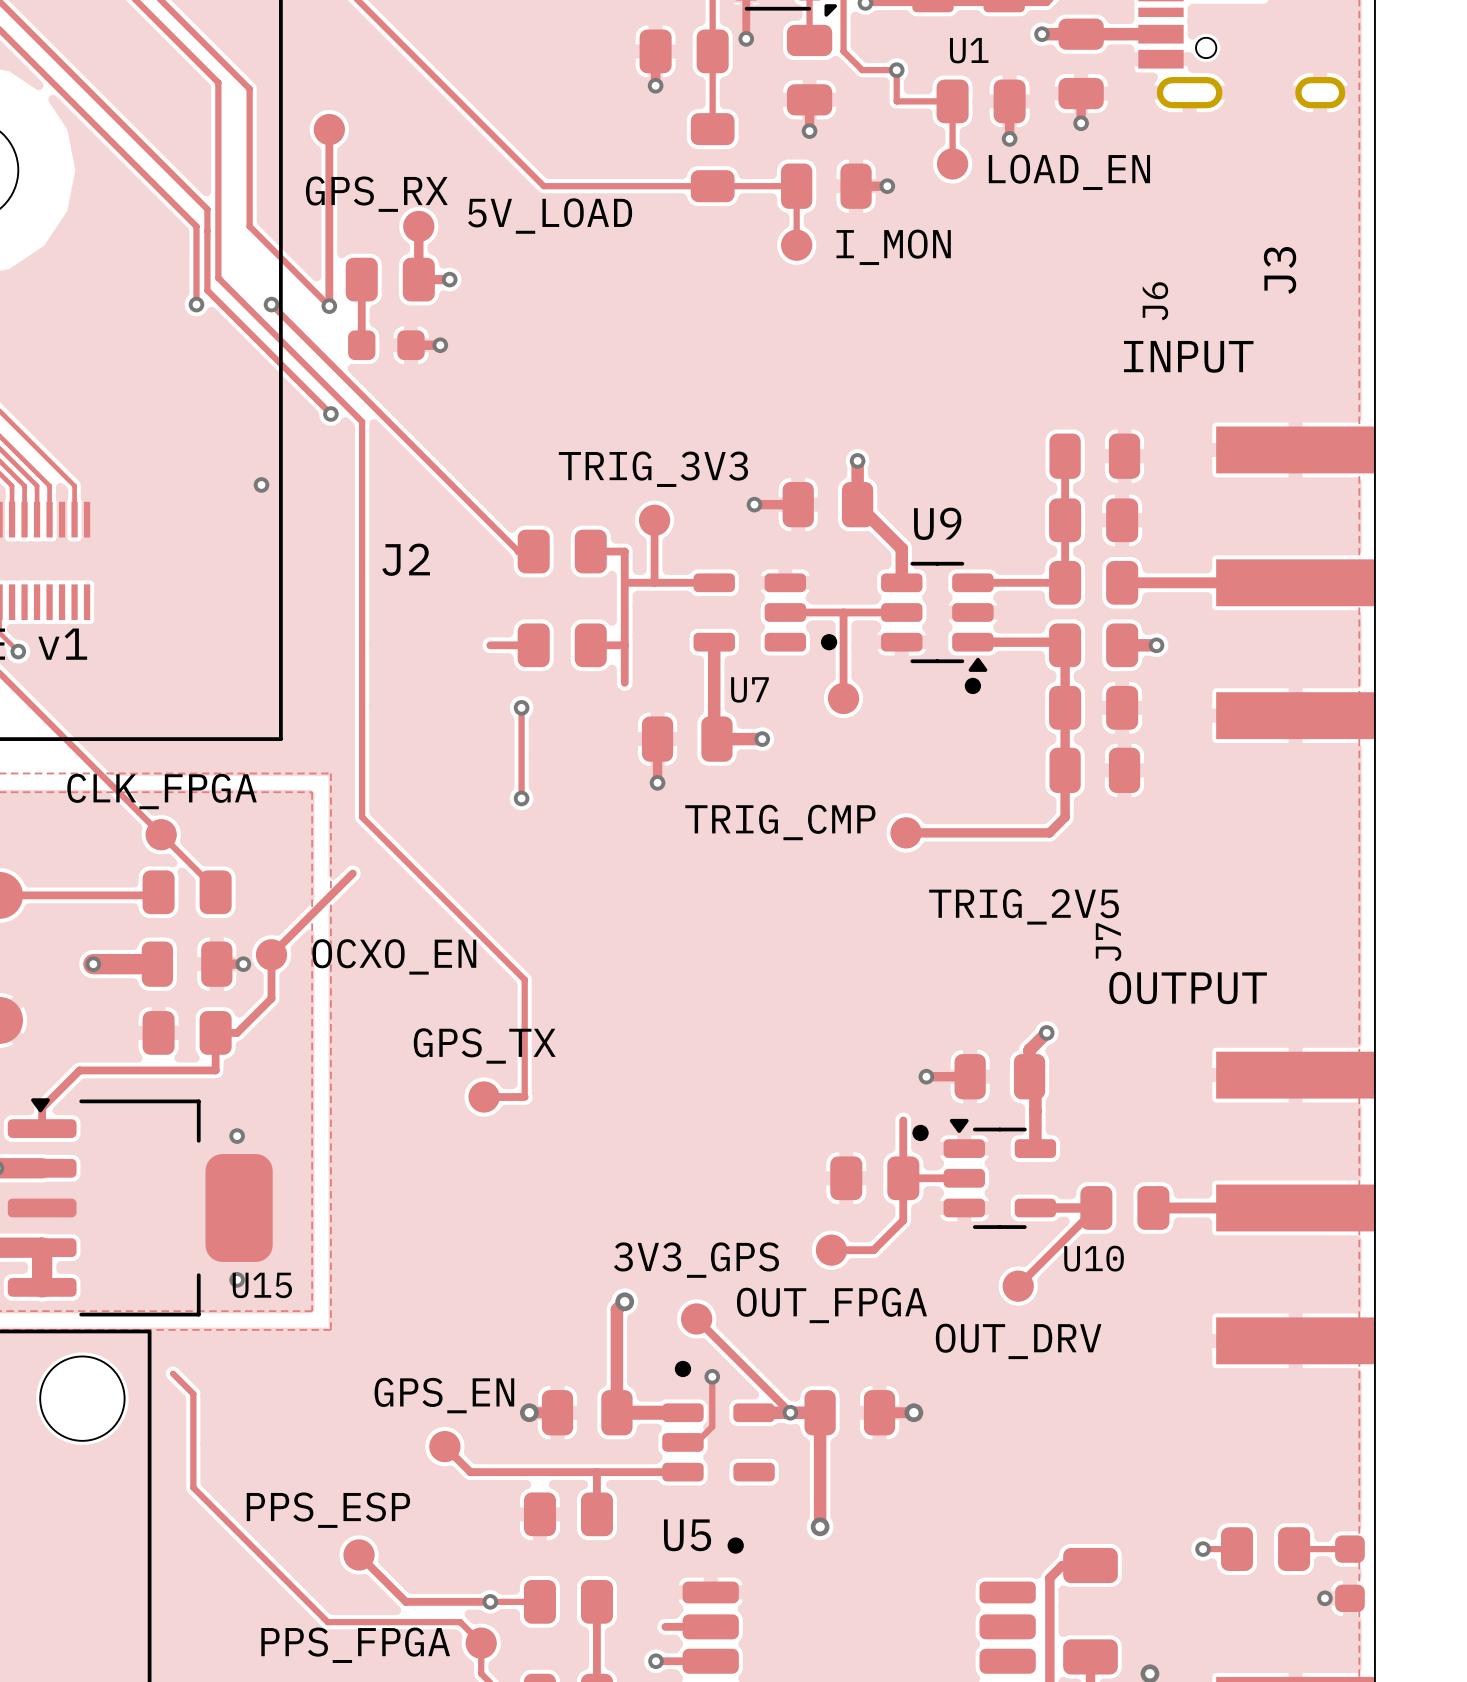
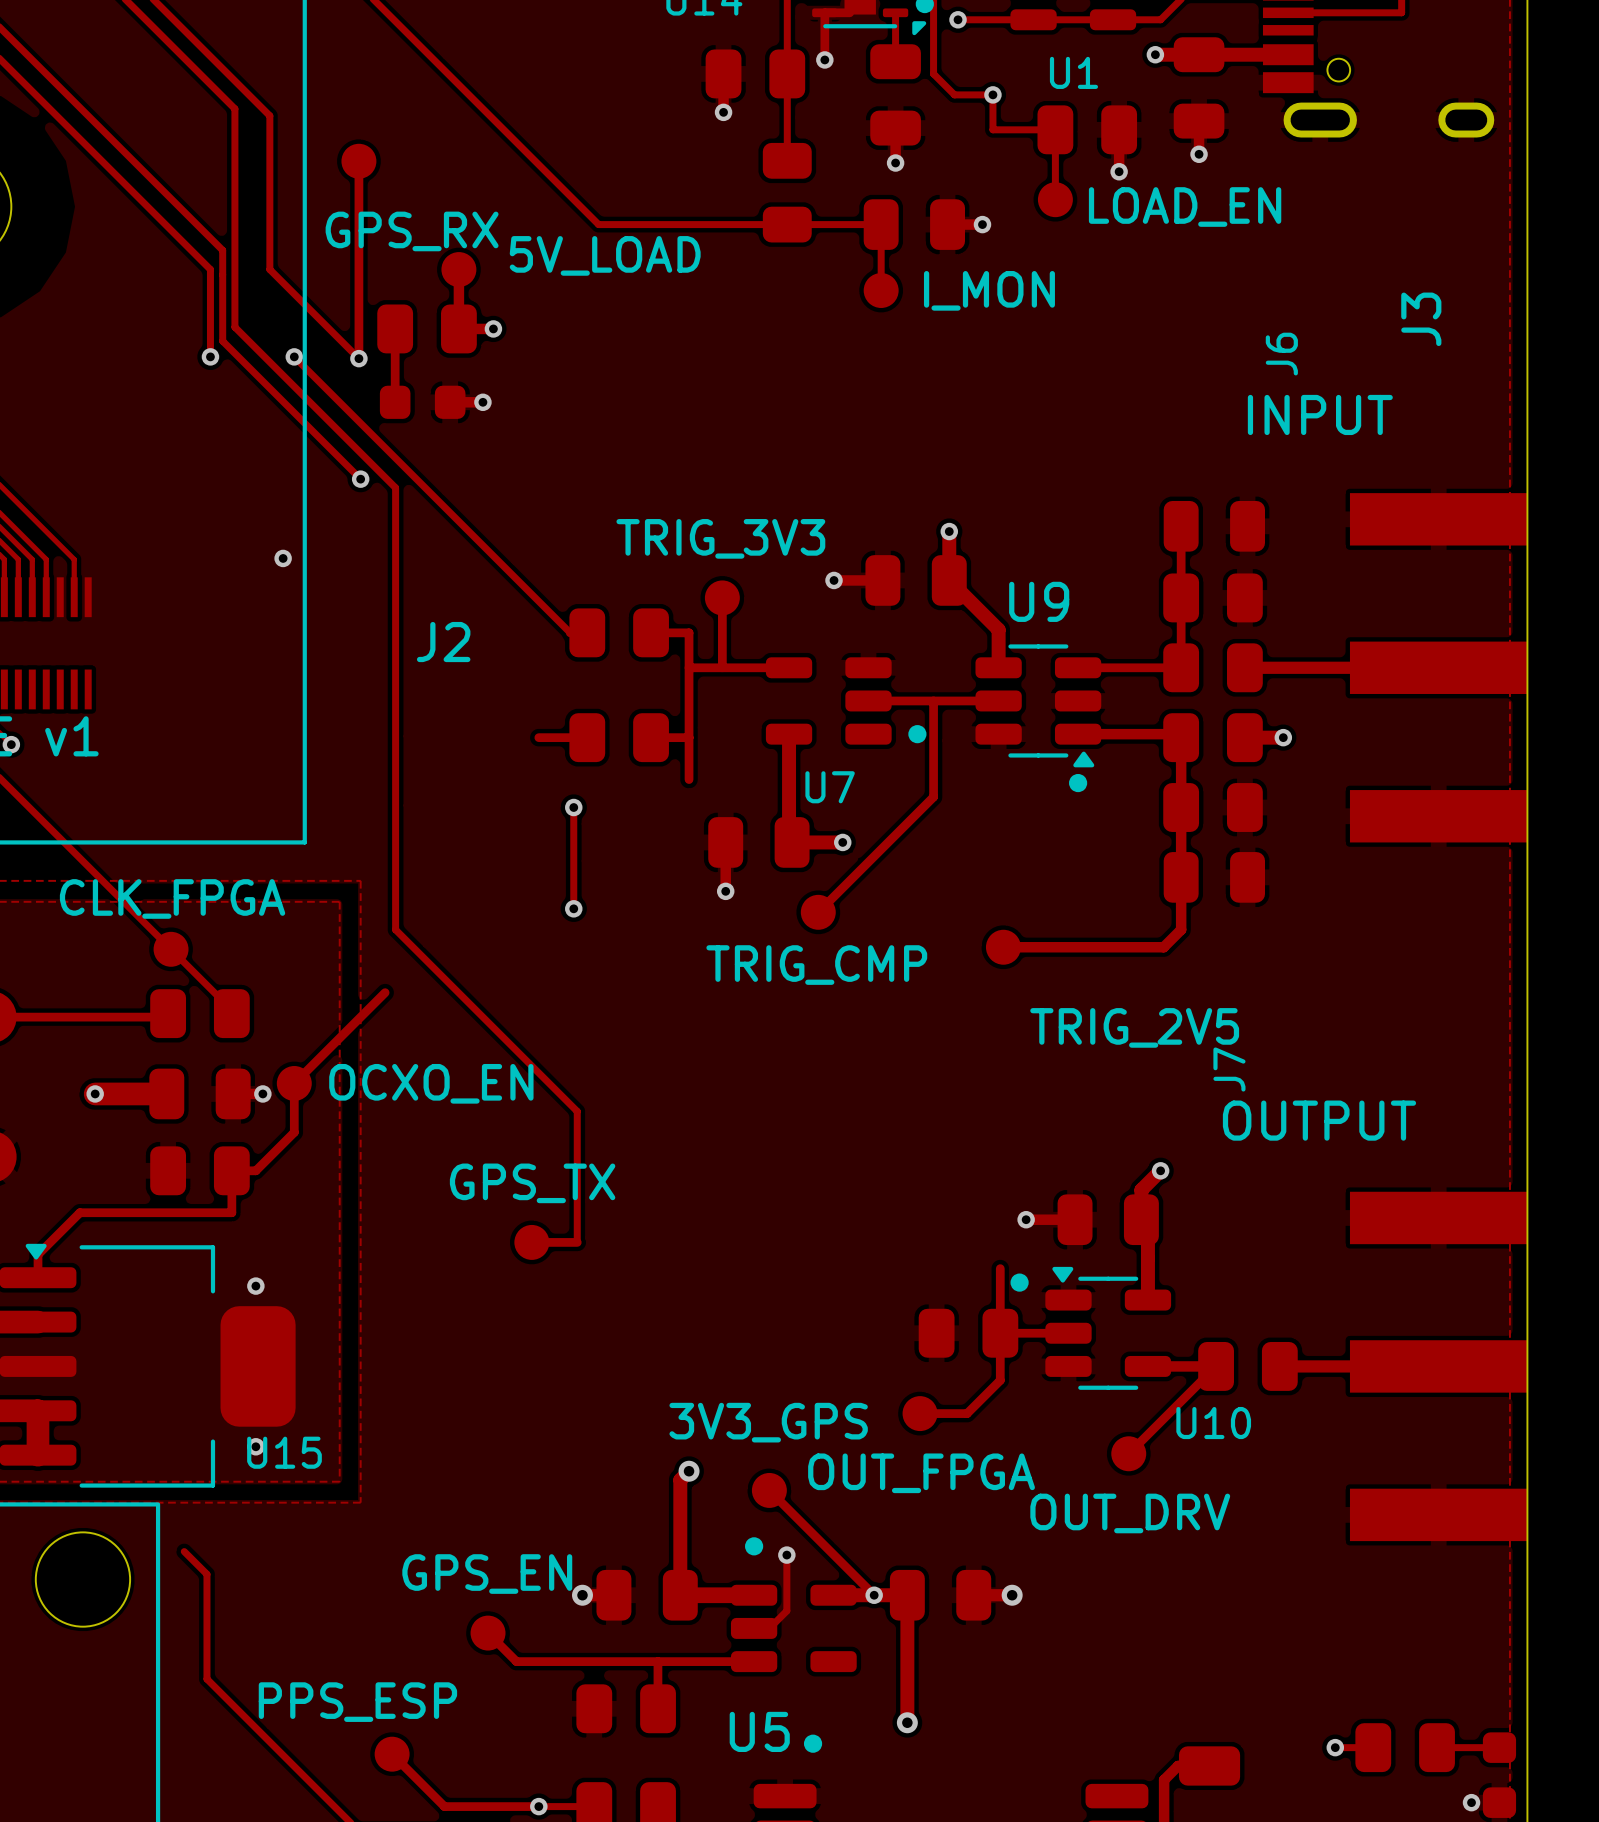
track: none -> (933, 797) (818, 912)
part position: (843, 698) -> (818, 912)
part value position: TRIG_CMP (780, 822) -> TRIG_CMP (816, 965)

